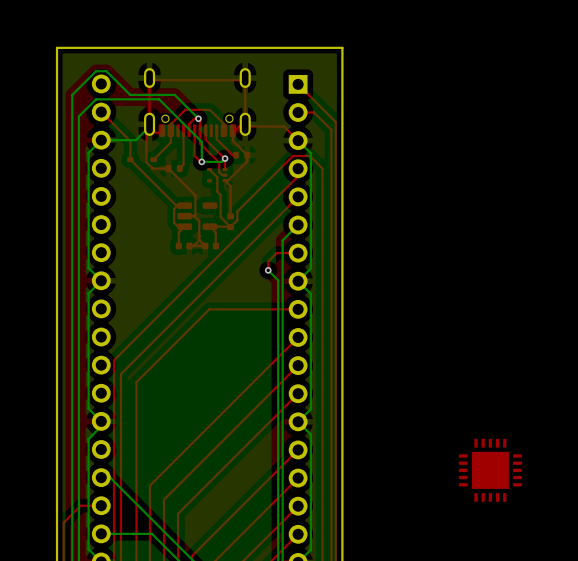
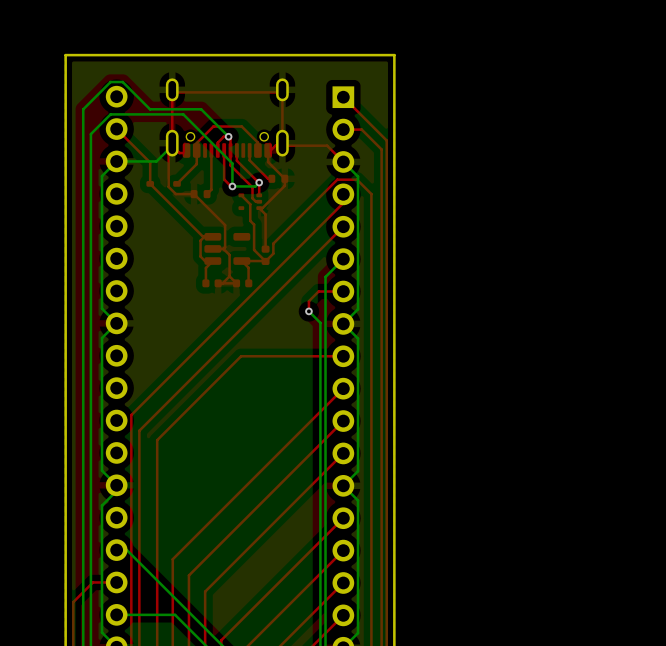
part: (490, 470) -> none

